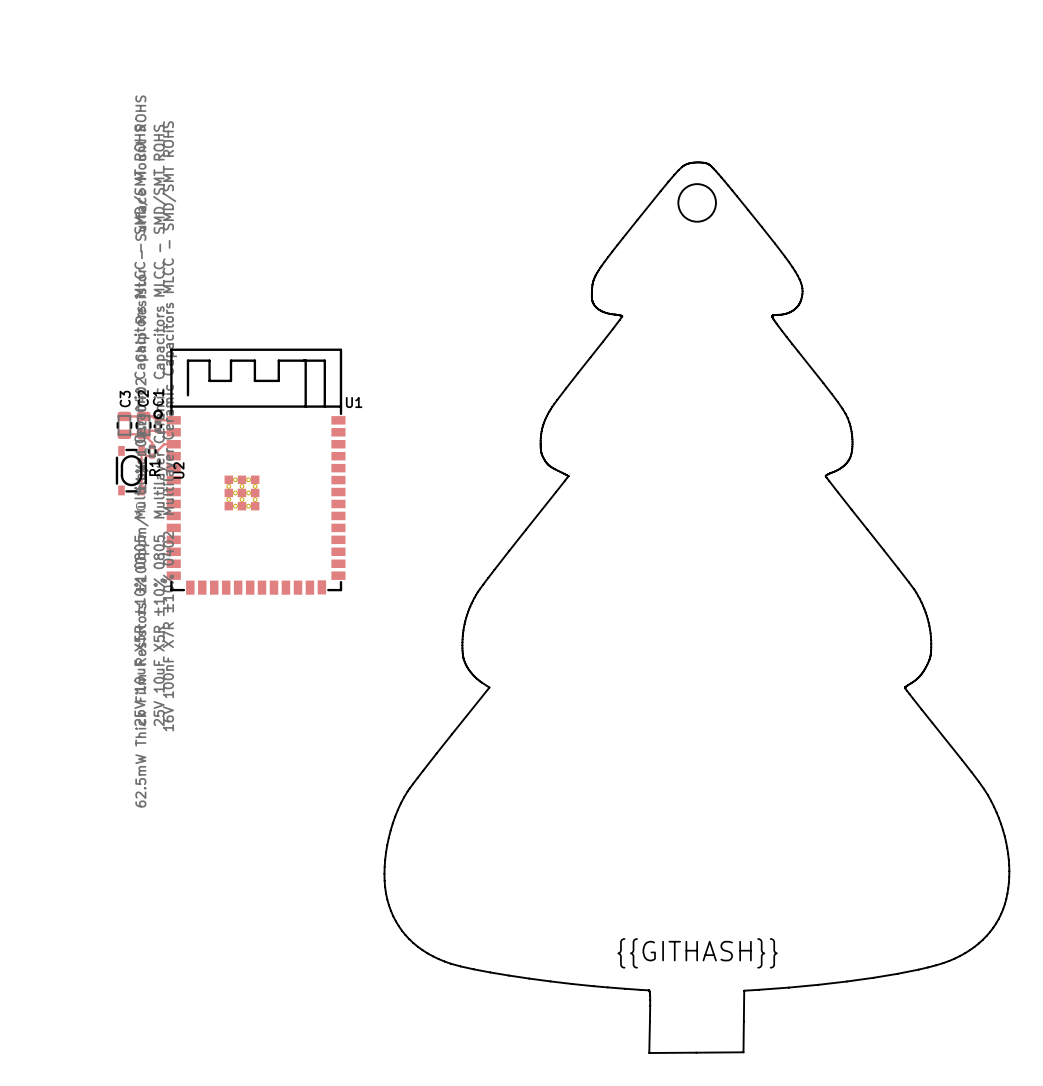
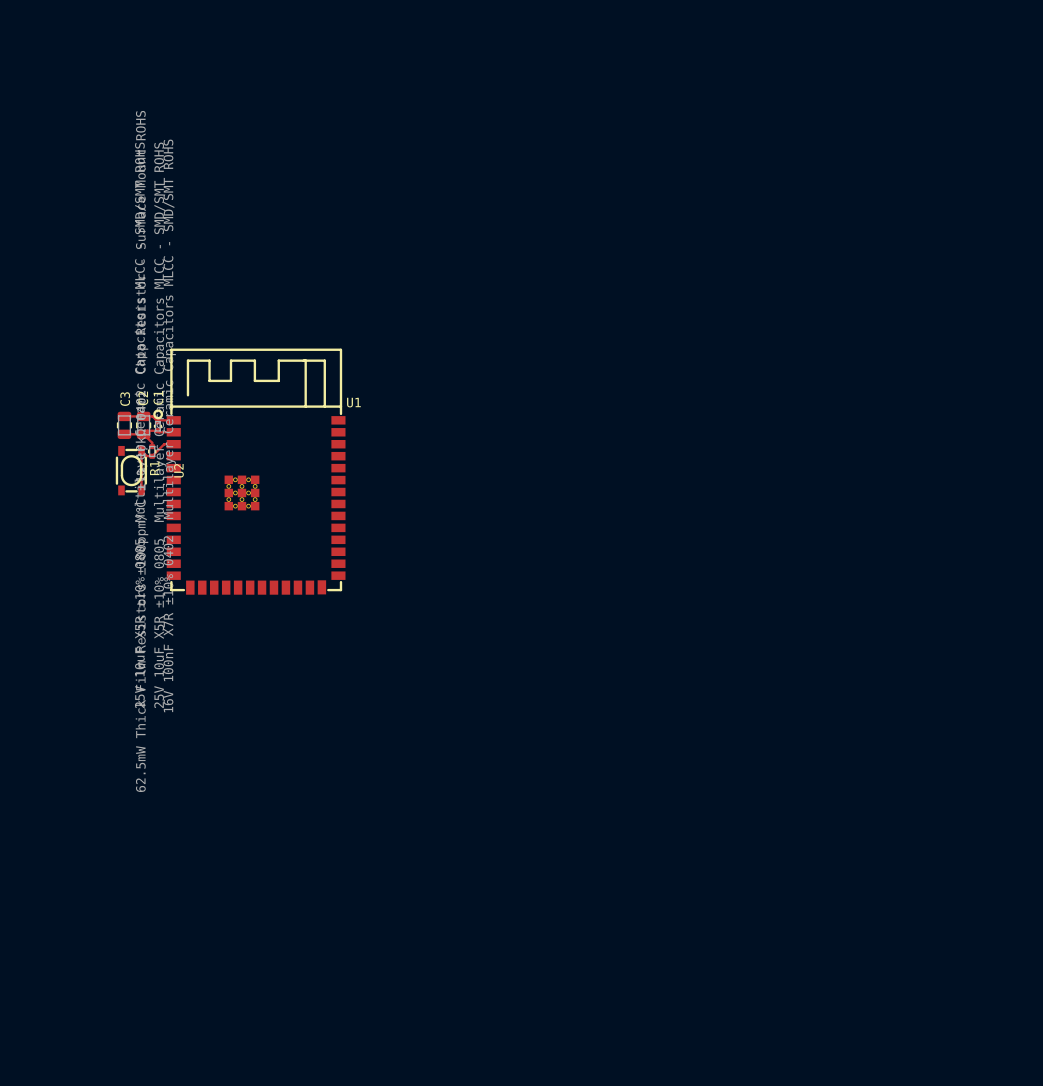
round board edge: [677, 183, 717, 223] -> none
board edge: (621, 315) (603, 311) (594, 304) (591, 291) (595, 275) (612, 251) (674, 174) (684, 165) (697, 162) (708, 164) (718, 174) (774, 243) (799, 279) (802, 293) (798, 305) (788, 312) (771, 315) -> none
board edge: (622, 316) (554, 404) (543, 424) (540, 442) (542, 456) (550, 466) (568, 476) -> none
board edge: (771, 316) (838, 402) (849, 421) (852, 439) (850, 456) (842, 466) (825, 475) -> none
board edge: (568, 476) (488, 577) (472, 600) (463, 627) (463, 657) (471, 673) (489, 687) (407, 791) (397, 809) (390, 830) (384, 873) (388, 905) (401, 930) (413, 943) (427, 953) (450, 963) (490, 972) (572, 984) (648, 990) (649, 1053) (743, 1052) (744, 990) (873, 977) (927, 967) (960, 955) (986, 935) (996, 923) (1003, 909) (1009, 876) (1006, 841) (996, 812) (984, 789) (904, 687) -> none
board edge: (825, 476) (909, 582) (924, 608) (930, 633) (930, 657) (920, 675) (905, 687) -> none
text: {{GITHASH}} (697, 953) -> none

